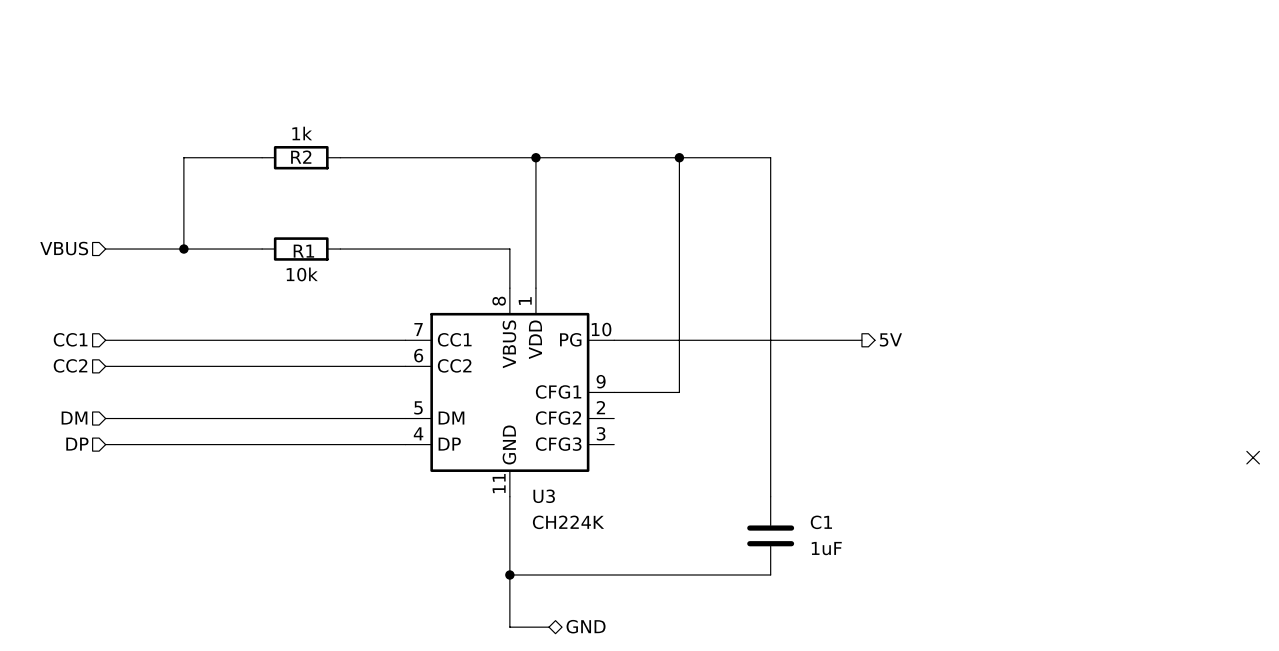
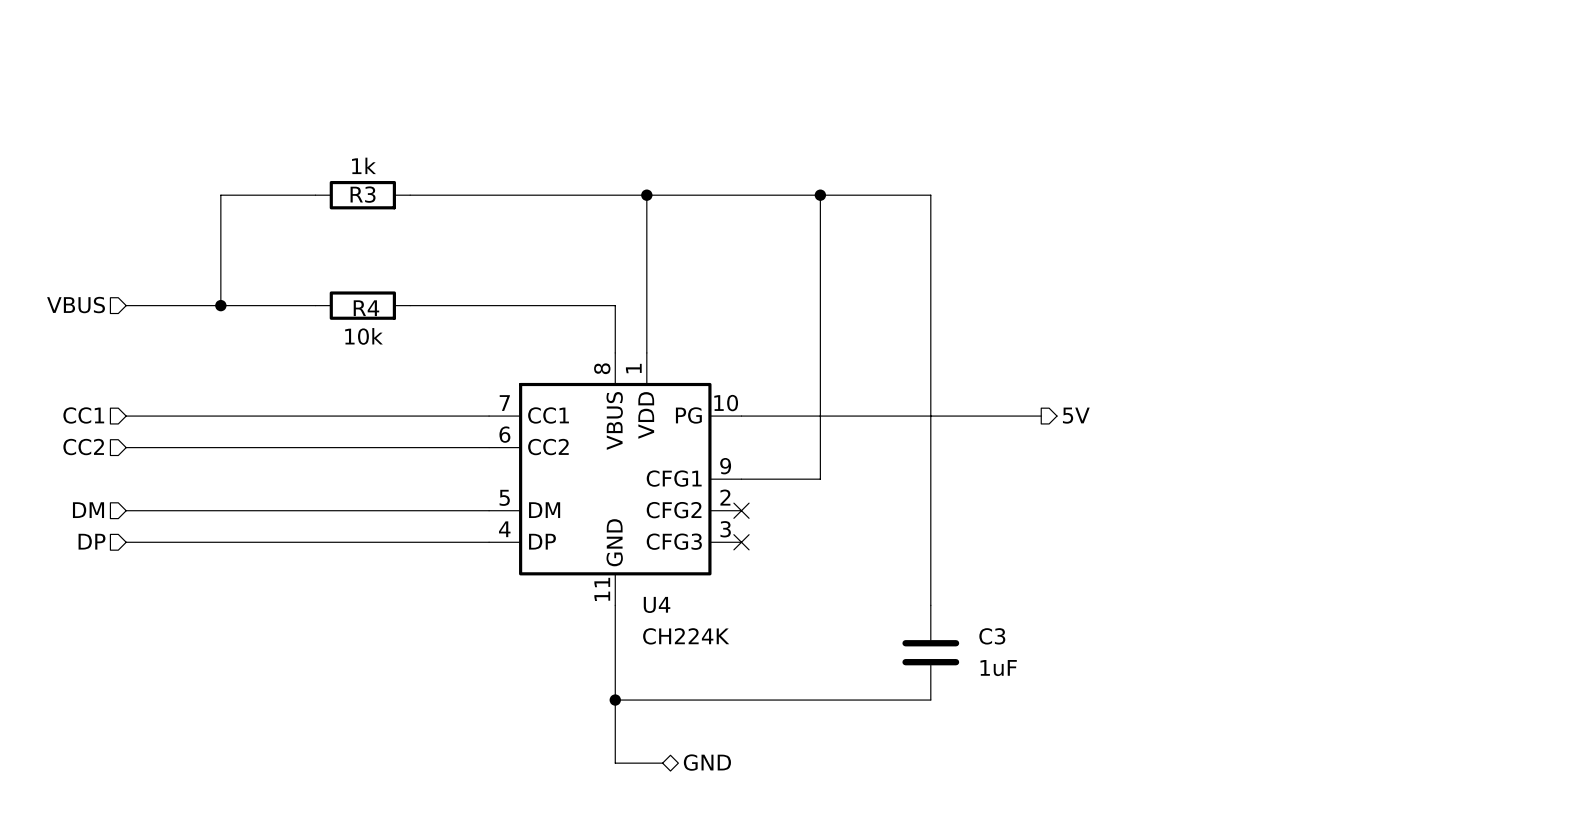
R2 name: R2 (301, 157) -> R3 (363, 194)
R1 name: R1 (303, 251) -> R4 (366, 308)
no-connect mark: none -> (741, 510)
no-connect mark: none -> (741, 542)
no-connect mark: (1253, 457) -> none
U3 name: U3 (544, 496) -> U4 (657, 604)
C1 name: C1 (821, 522) -> C3 (992, 636)

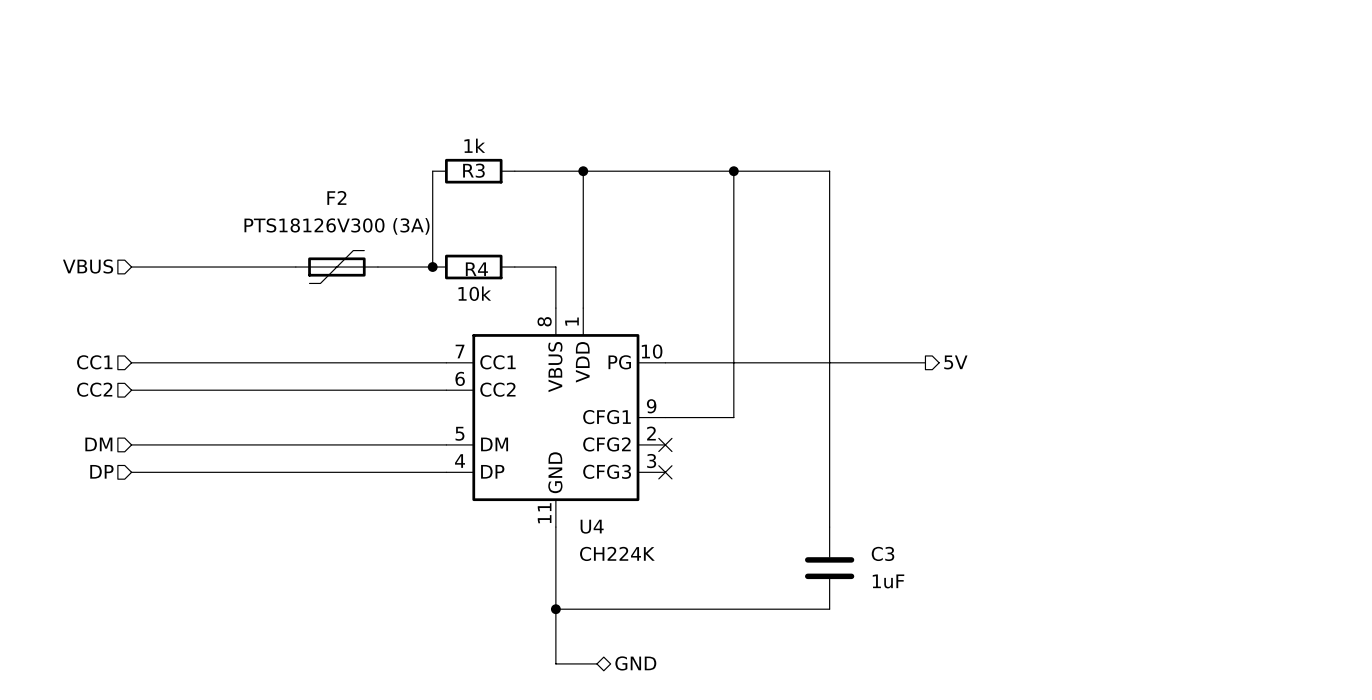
wire: (315, 195) (220, 195) (220, 305) -> none
R3 position: (362, 195) -> (473, 171)
wire: (410, 195) (567, 195) -> none
junction: (220, 305) -> none
R4 position: (362, 305) -> (473, 267)
F2: none -> PTS18126V300 (3A) (336, 267)
wire: (473, 305) (567, 305) -> (432, 267) (432, 171)
junction: none -> (432, 267)

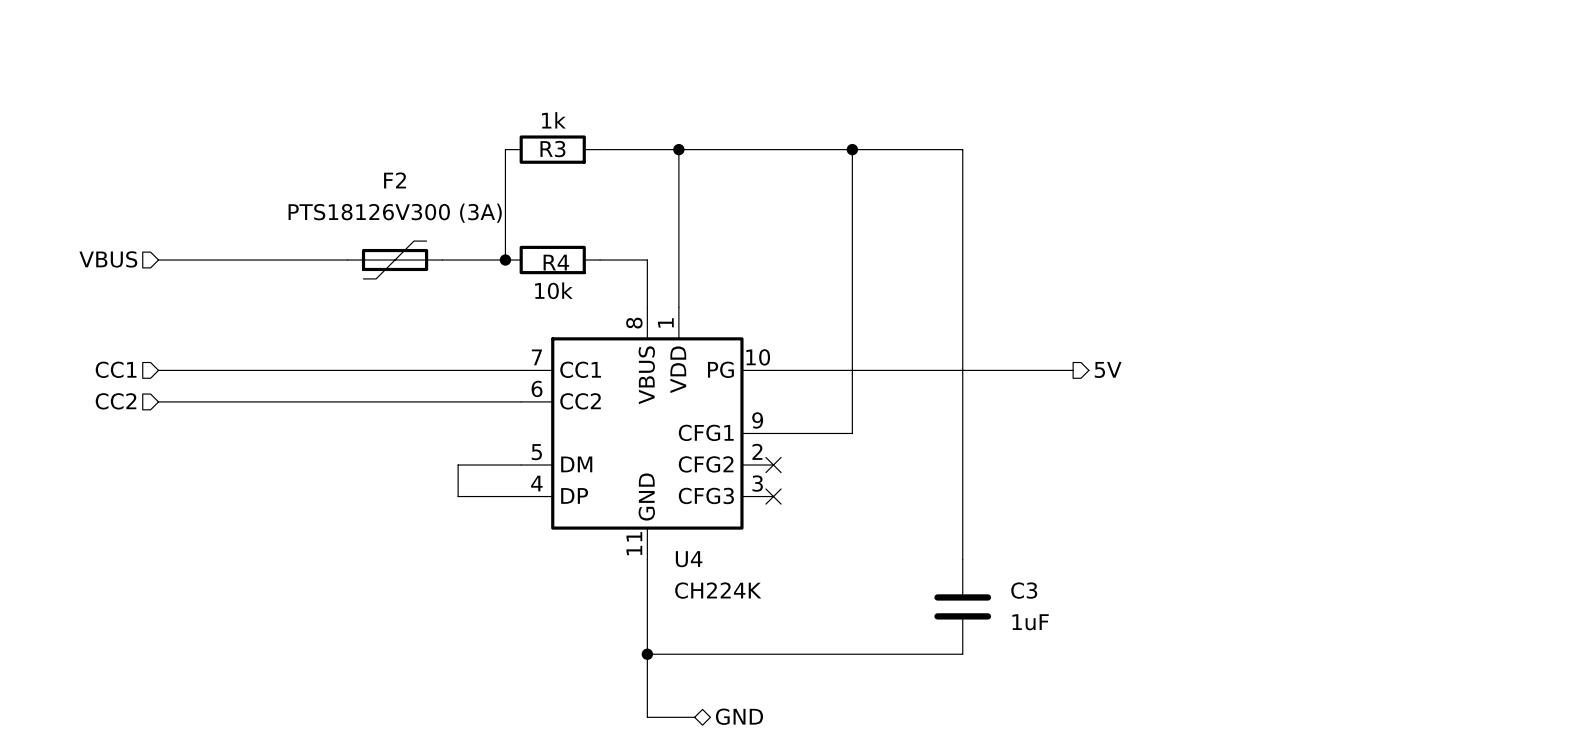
hierarchical label: DM (98, 444) -> none
wire: (131, 444) (391, 444) -> (458, 496) (458, 465)
hierarchical label: DP (101, 471) -> none
wire: (131, 472) (391, 472) -> none

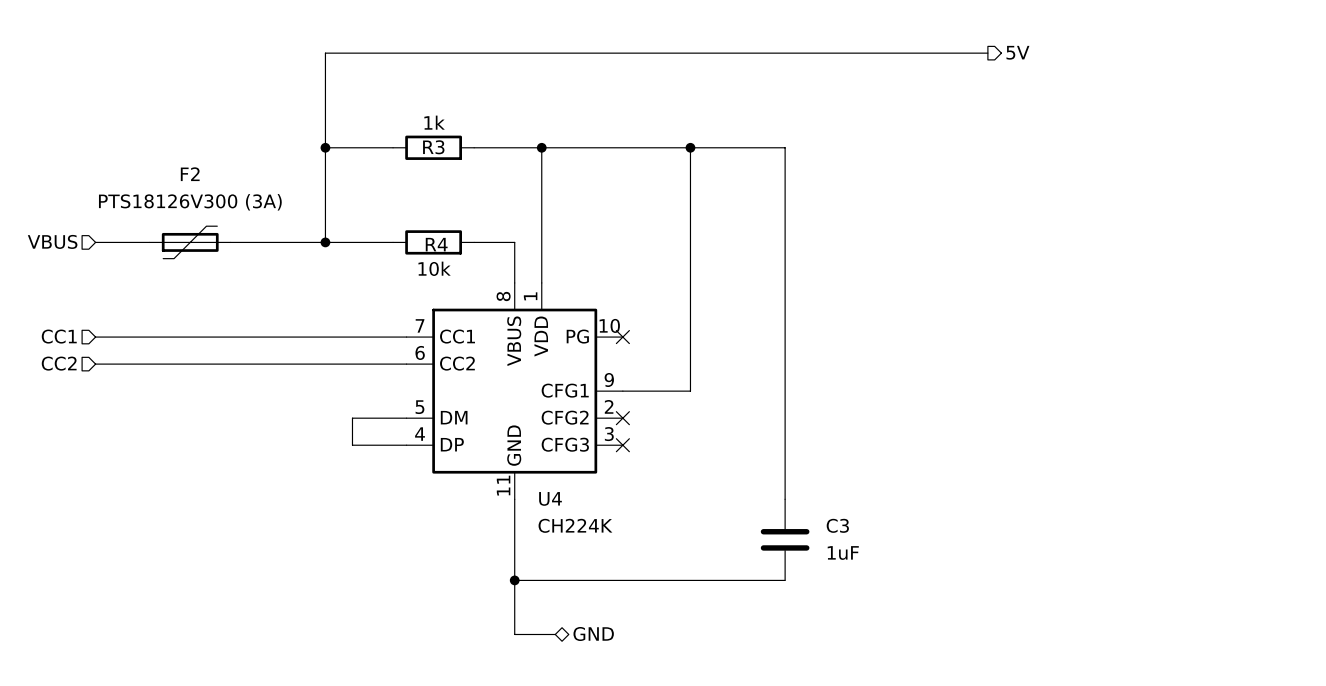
hierarchical label: none -> 5V (1017, 52)
wire: none -> (987, 53) (325, 53) (325, 242)
junction: none -> (325, 147)
wire: (505, 149) (505, 260) -> (393, 147) (325, 147)
F2 position: (395, 260) -> (190, 242)
junction: none -> (325, 242)
junction: (505, 260) -> none
hierarchical label: 5V (1108, 369) -> none
wire: (773, 370) (1073, 370) -> none
no-connect mark: none -> (622, 337)

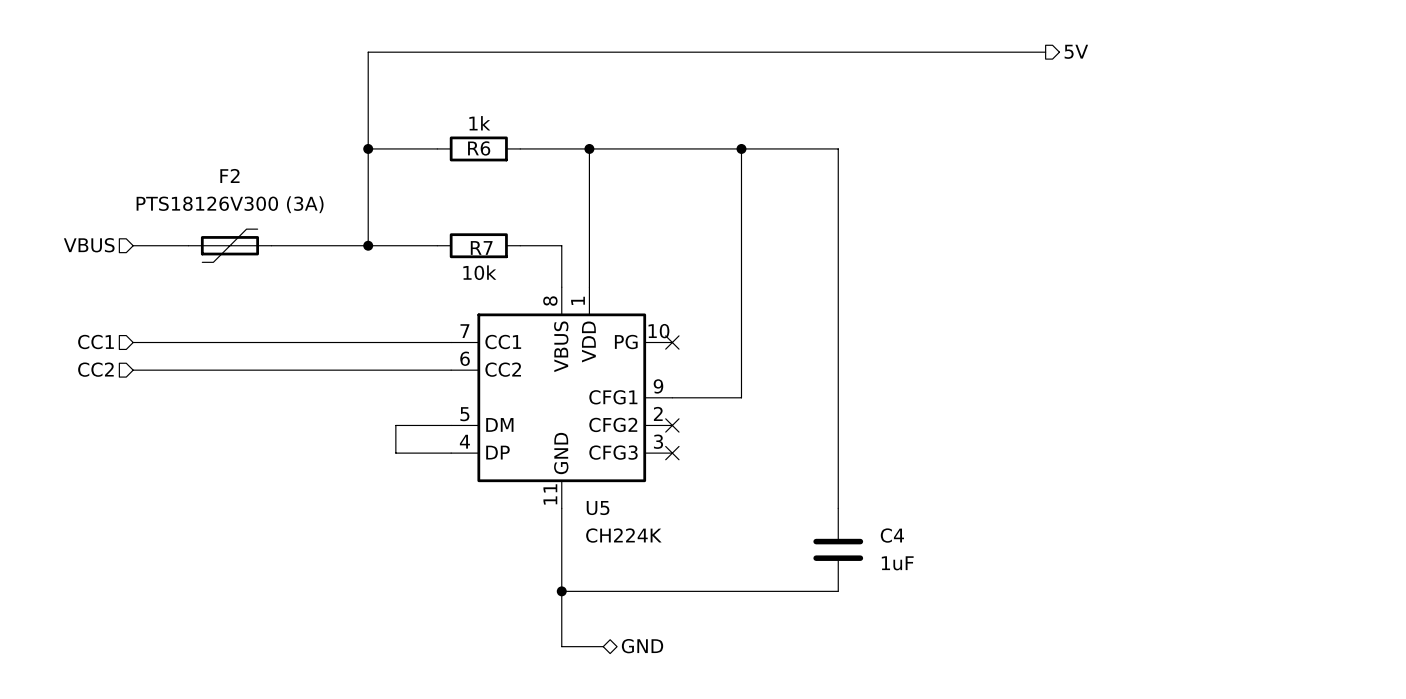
R3 name: R3 (433, 147) -> R6 (479, 148)
R4 name: R4 (436, 244) -> R7 (481, 247)
U4 name: U4 (550, 498) -> U5 (598, 508)
C3 name: C3 (837, 525) -> C4 (892, 535)

